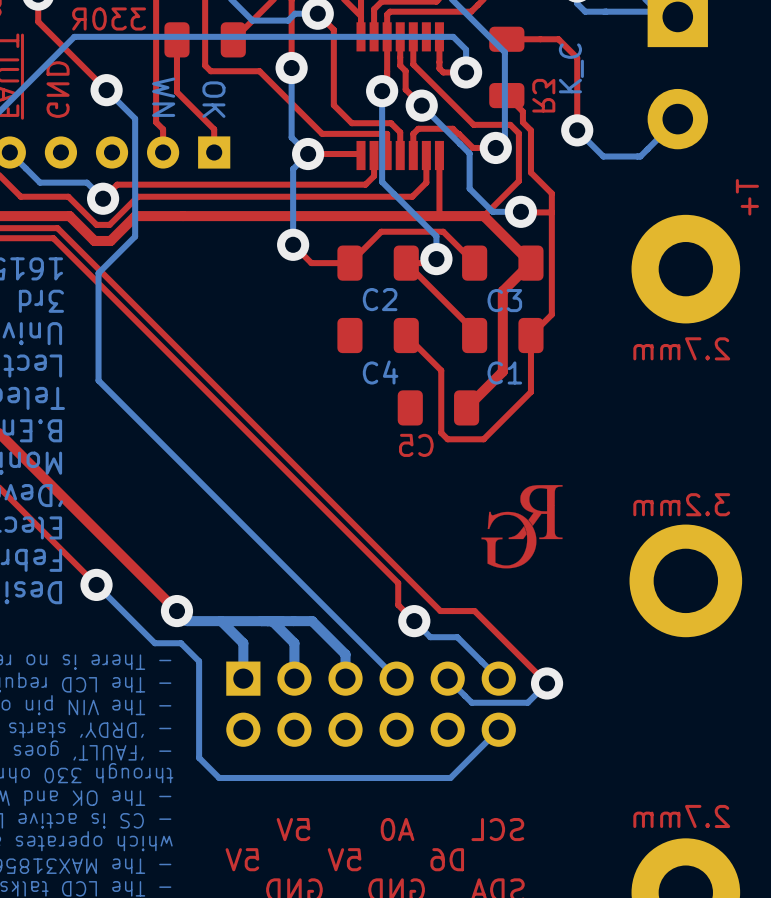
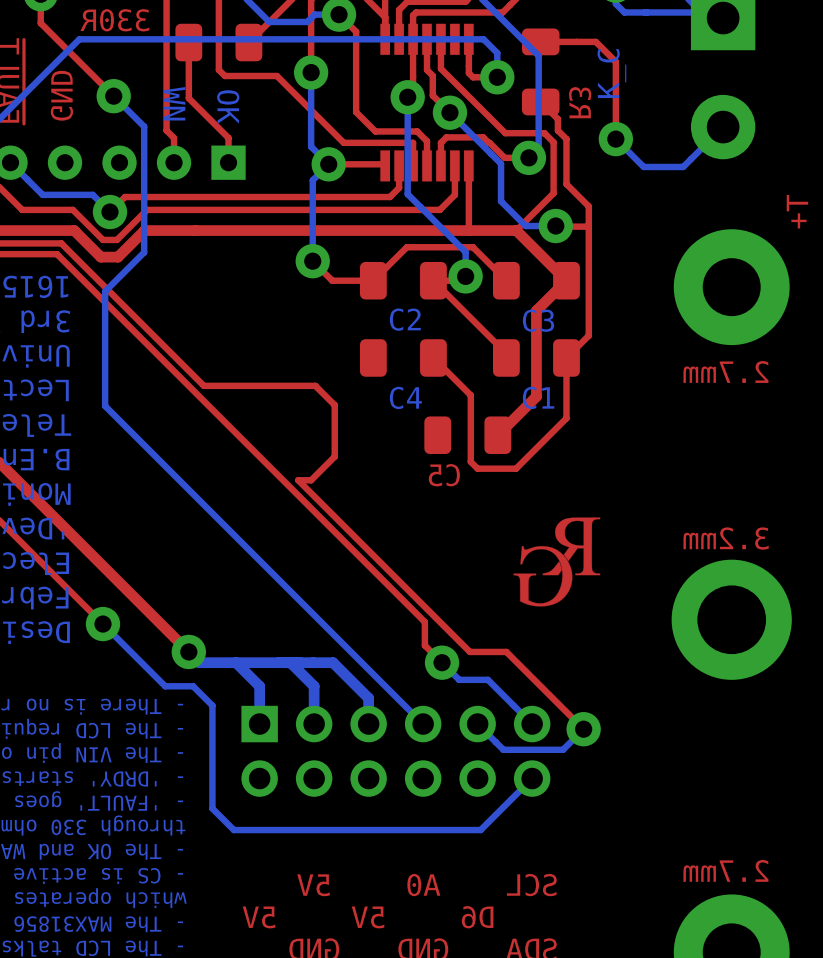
top track: (191, 361) (279, 450) -> (203, 385) (315, 385) (334, 405) (334, 456) (311, 480) (298, 480)

